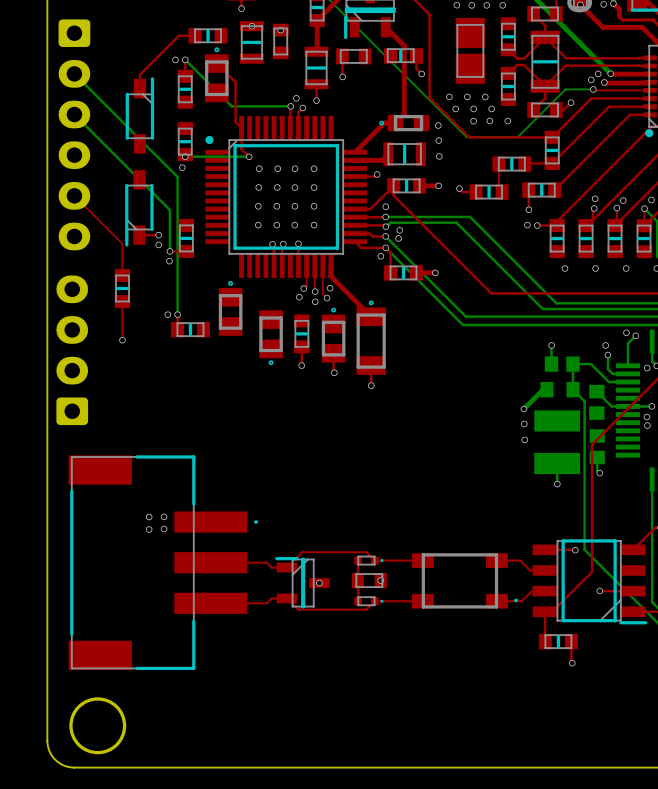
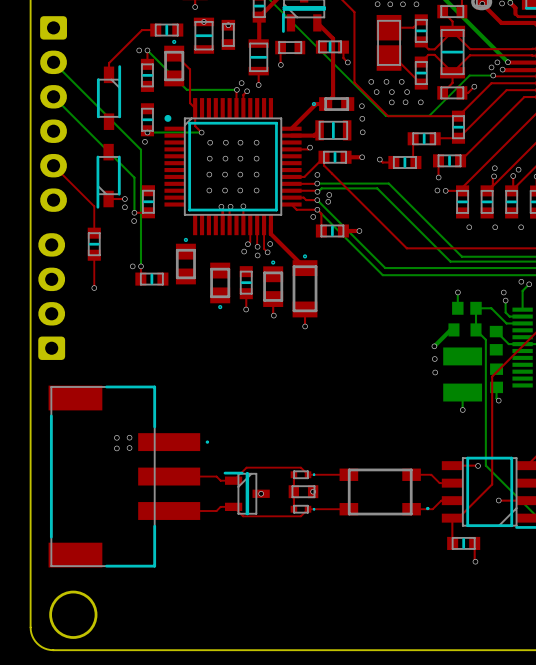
top track: none -> (421, 19) (413, 27) (389, 27)
top track: none -> (389, 58) (395, 58) (421, 84)

